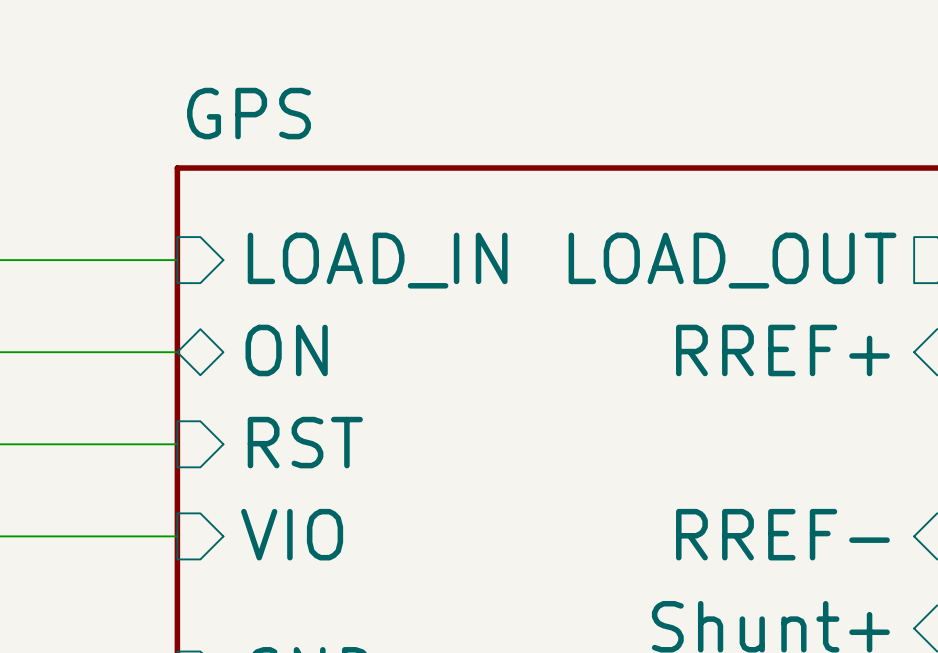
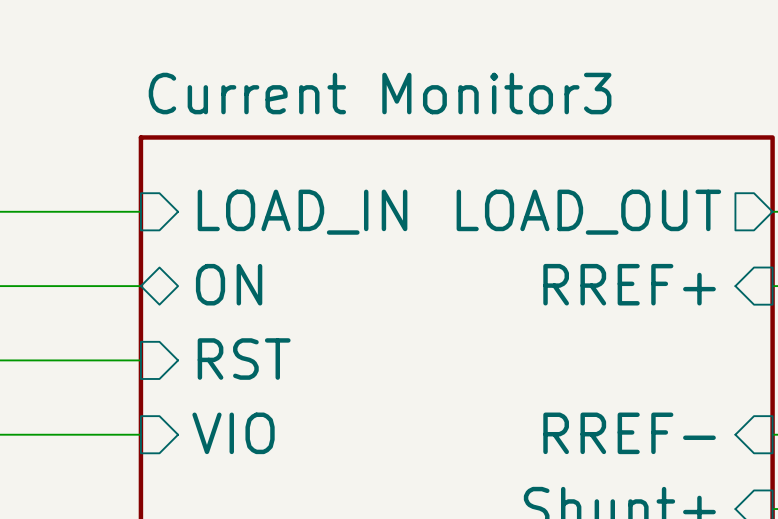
sheet GPS name: GPS (248, 113) -> Current Monitor3 (380, 93)

